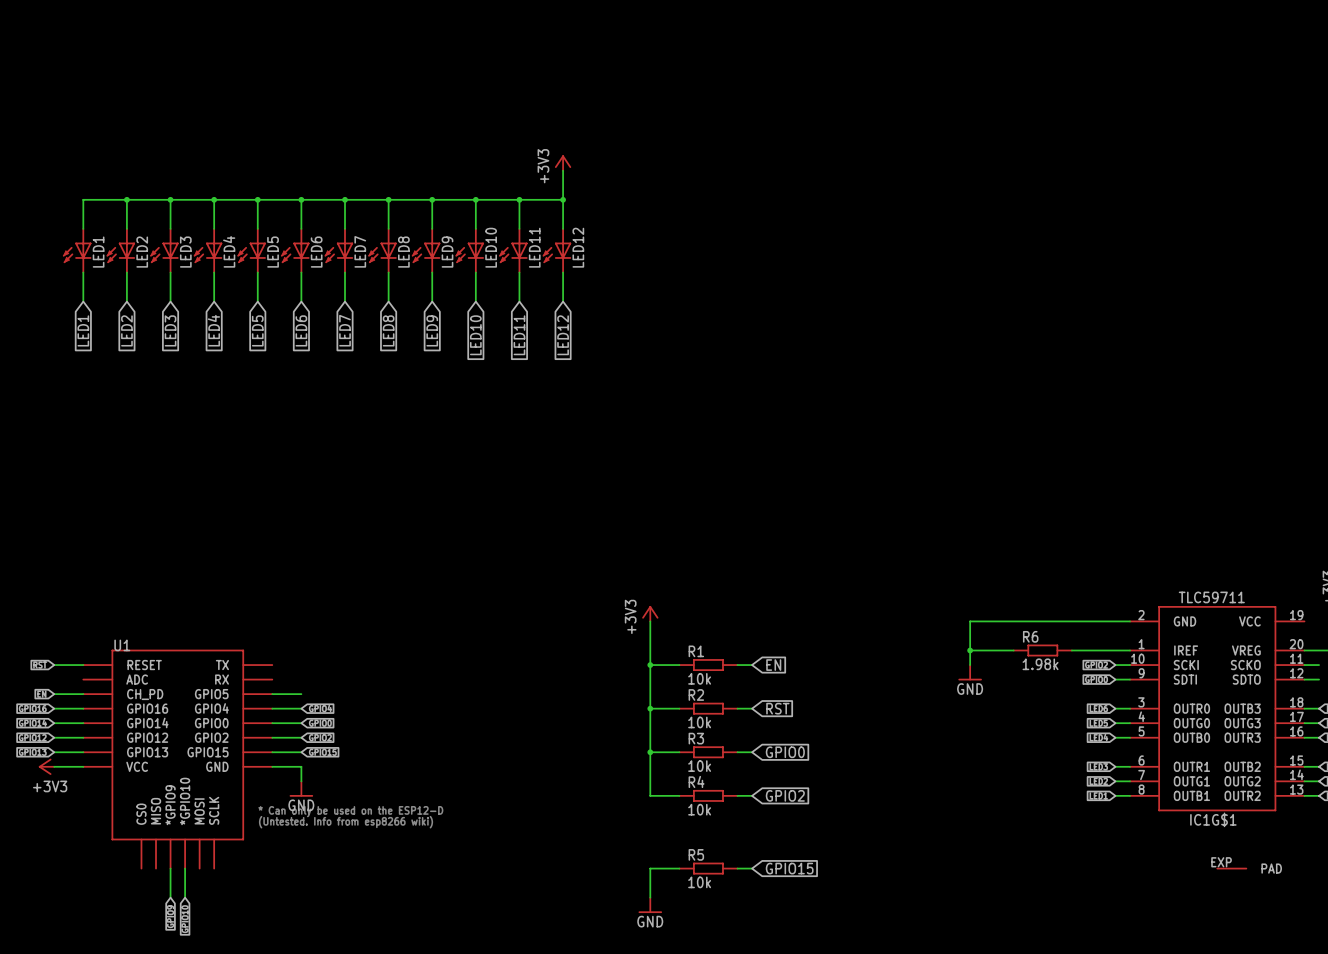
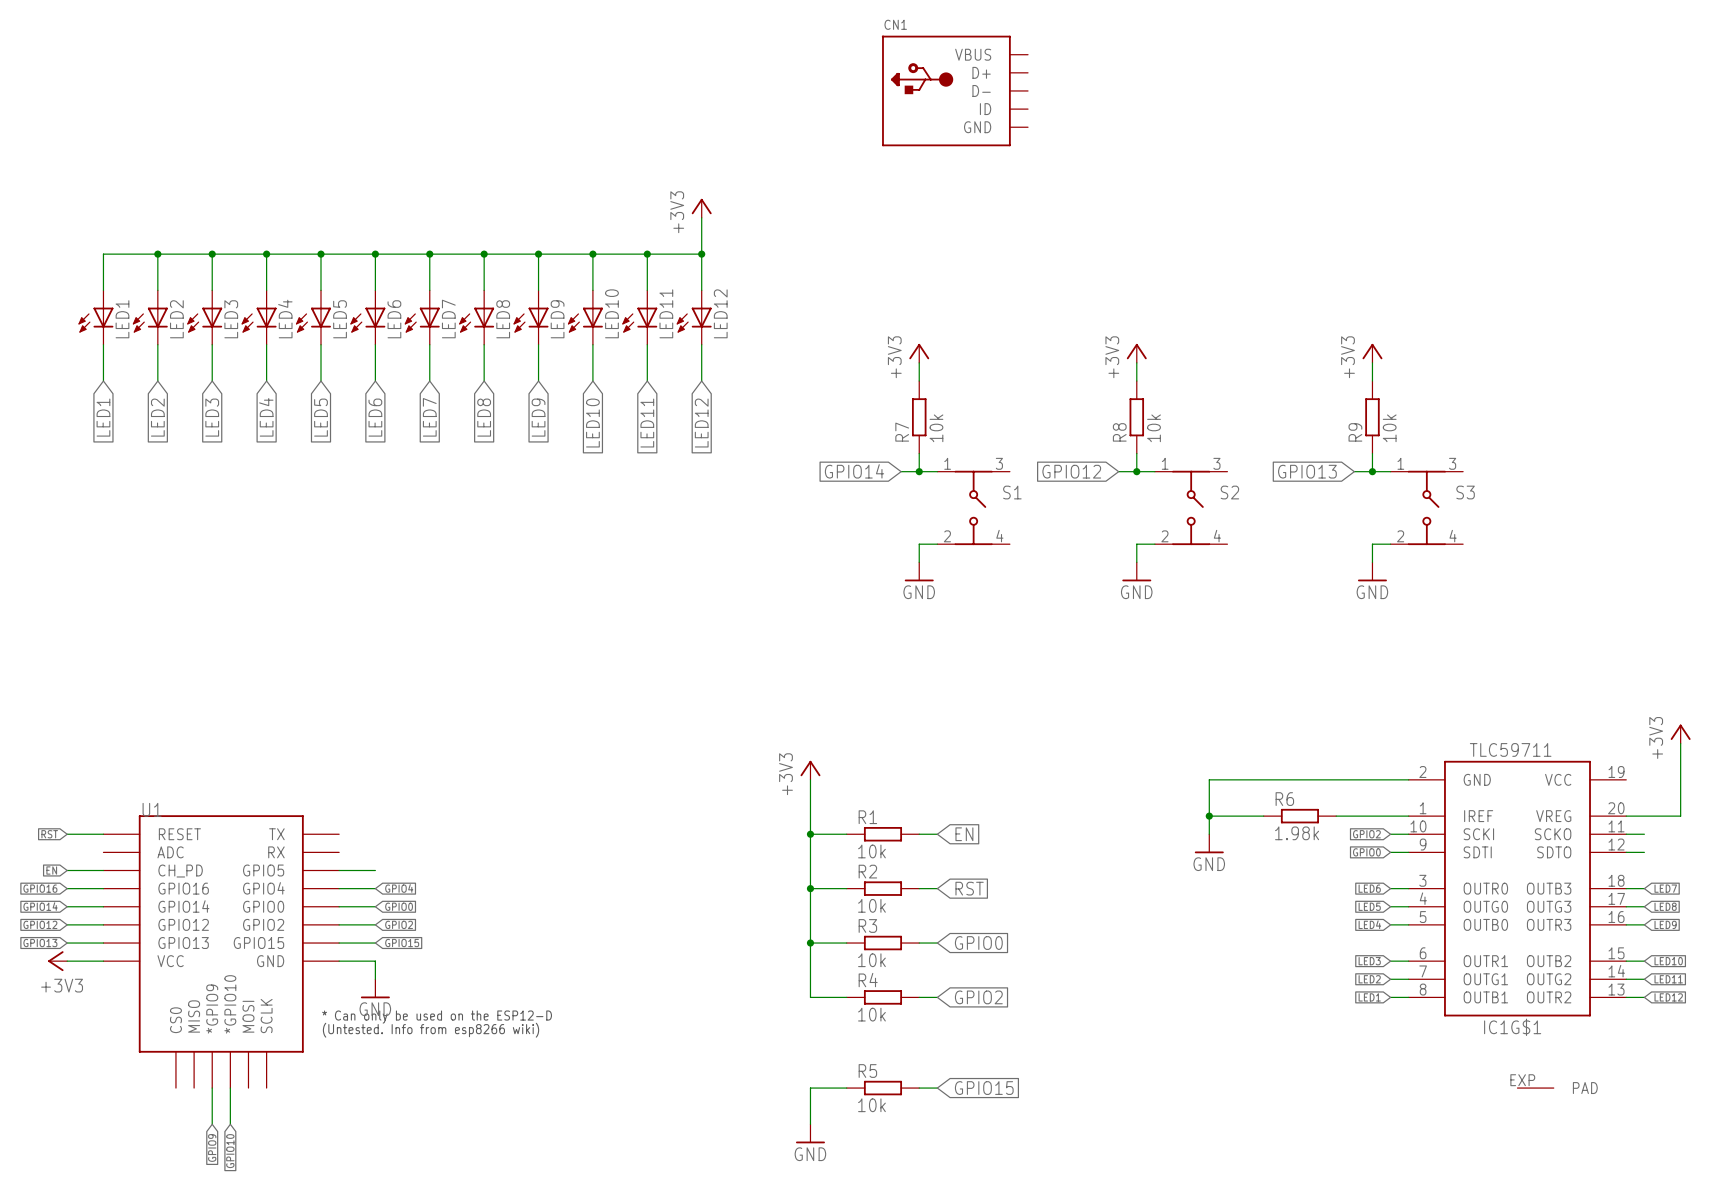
CN1: none -> (954, 90)
power symbol: none -> +3V3 (919, 353)
power symbol: none -> +3V3 (1136, 353)
power symbol: none -> +3V3 (1372, 353)
wire: none -> (919, 362) (919, 381)
wire: none -> (1136, 362) (1136, 381)
wire: none -> (1372, 362) (1372, 381)
R7: none -> 10k (919, 417)
R8: none -> 10k (1136, 417)
R9: none -> 10k (1372, 417)
wire: none -> (919, 453) (919, 471)
wire: none -> (1136, 453) (1136, 471)
wire: none -> (1372, 453) (1372, 471)
global label: none -> GPIO14 (854, 471)
wire: none -> (901, 471) (937, 471)
junction: none -> (919, 471)
global label: none -> GPIO12 (1071, 471)
wire: none -> (1118, 471) (1154, 471)
junction: none -> (1136, 471)
global label: none -> GPIO13 (1307, 471)
wire: none -> (1354, 471) (1390, 471)
junction: none -> (1372, 471)
S1: none -> (973, 507)
S2: none -> (1191, 507)
S3: none -> (1426, 507)
wire: none -> (937, 544) (919, 544) (919, 562)
wire: none -> (1154, 544) (1136, 544) (1136, 562)
wire: none -> (1390, 544) (1372, 544) (1372, 562)
power symbol: none -> GND (919, 571)
power symbol: none -> GND (1136, 571)
power symbol: none -> GND (1372, 571)

